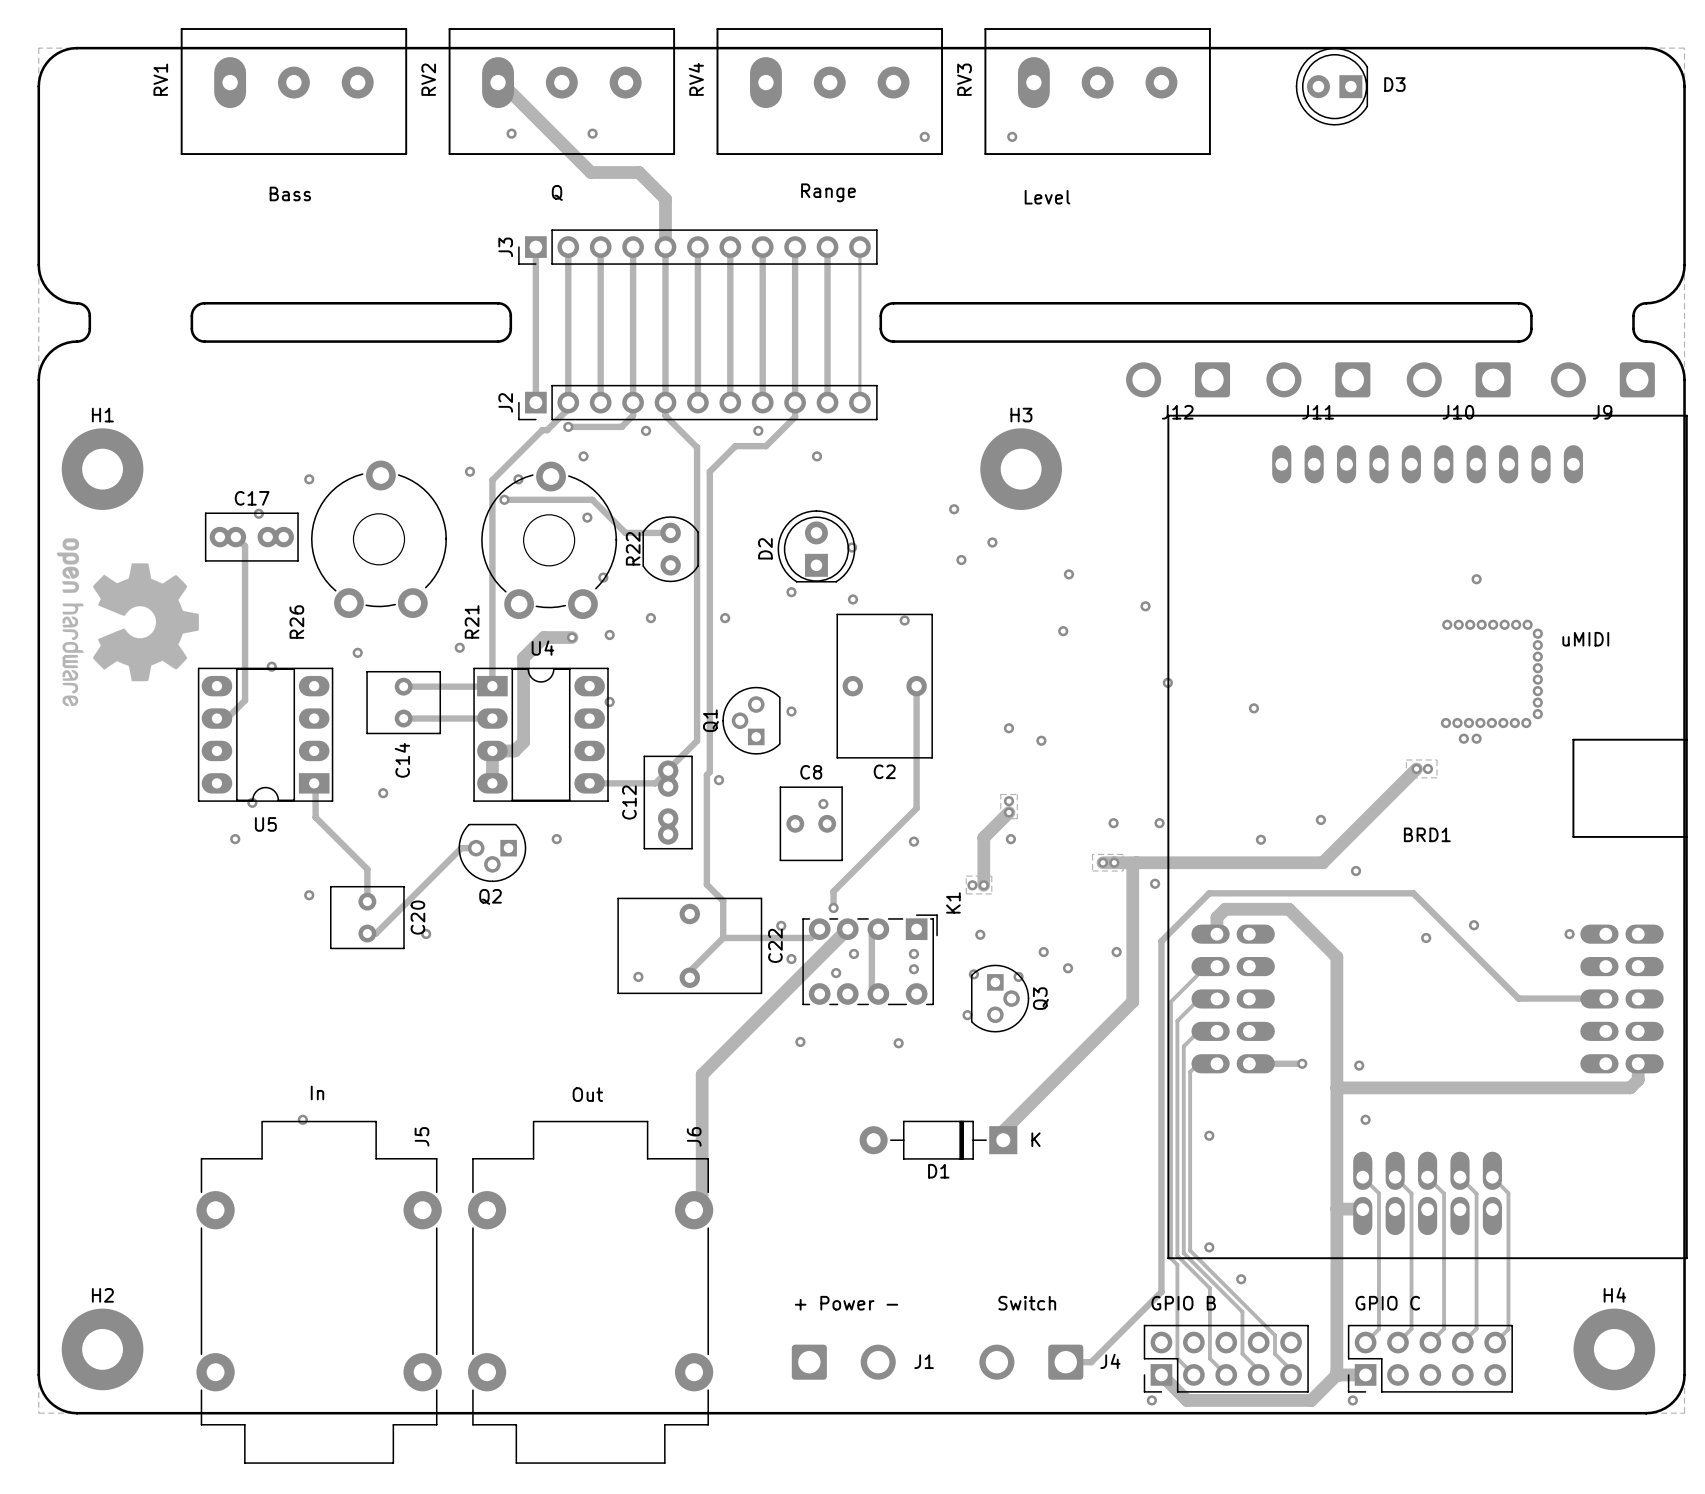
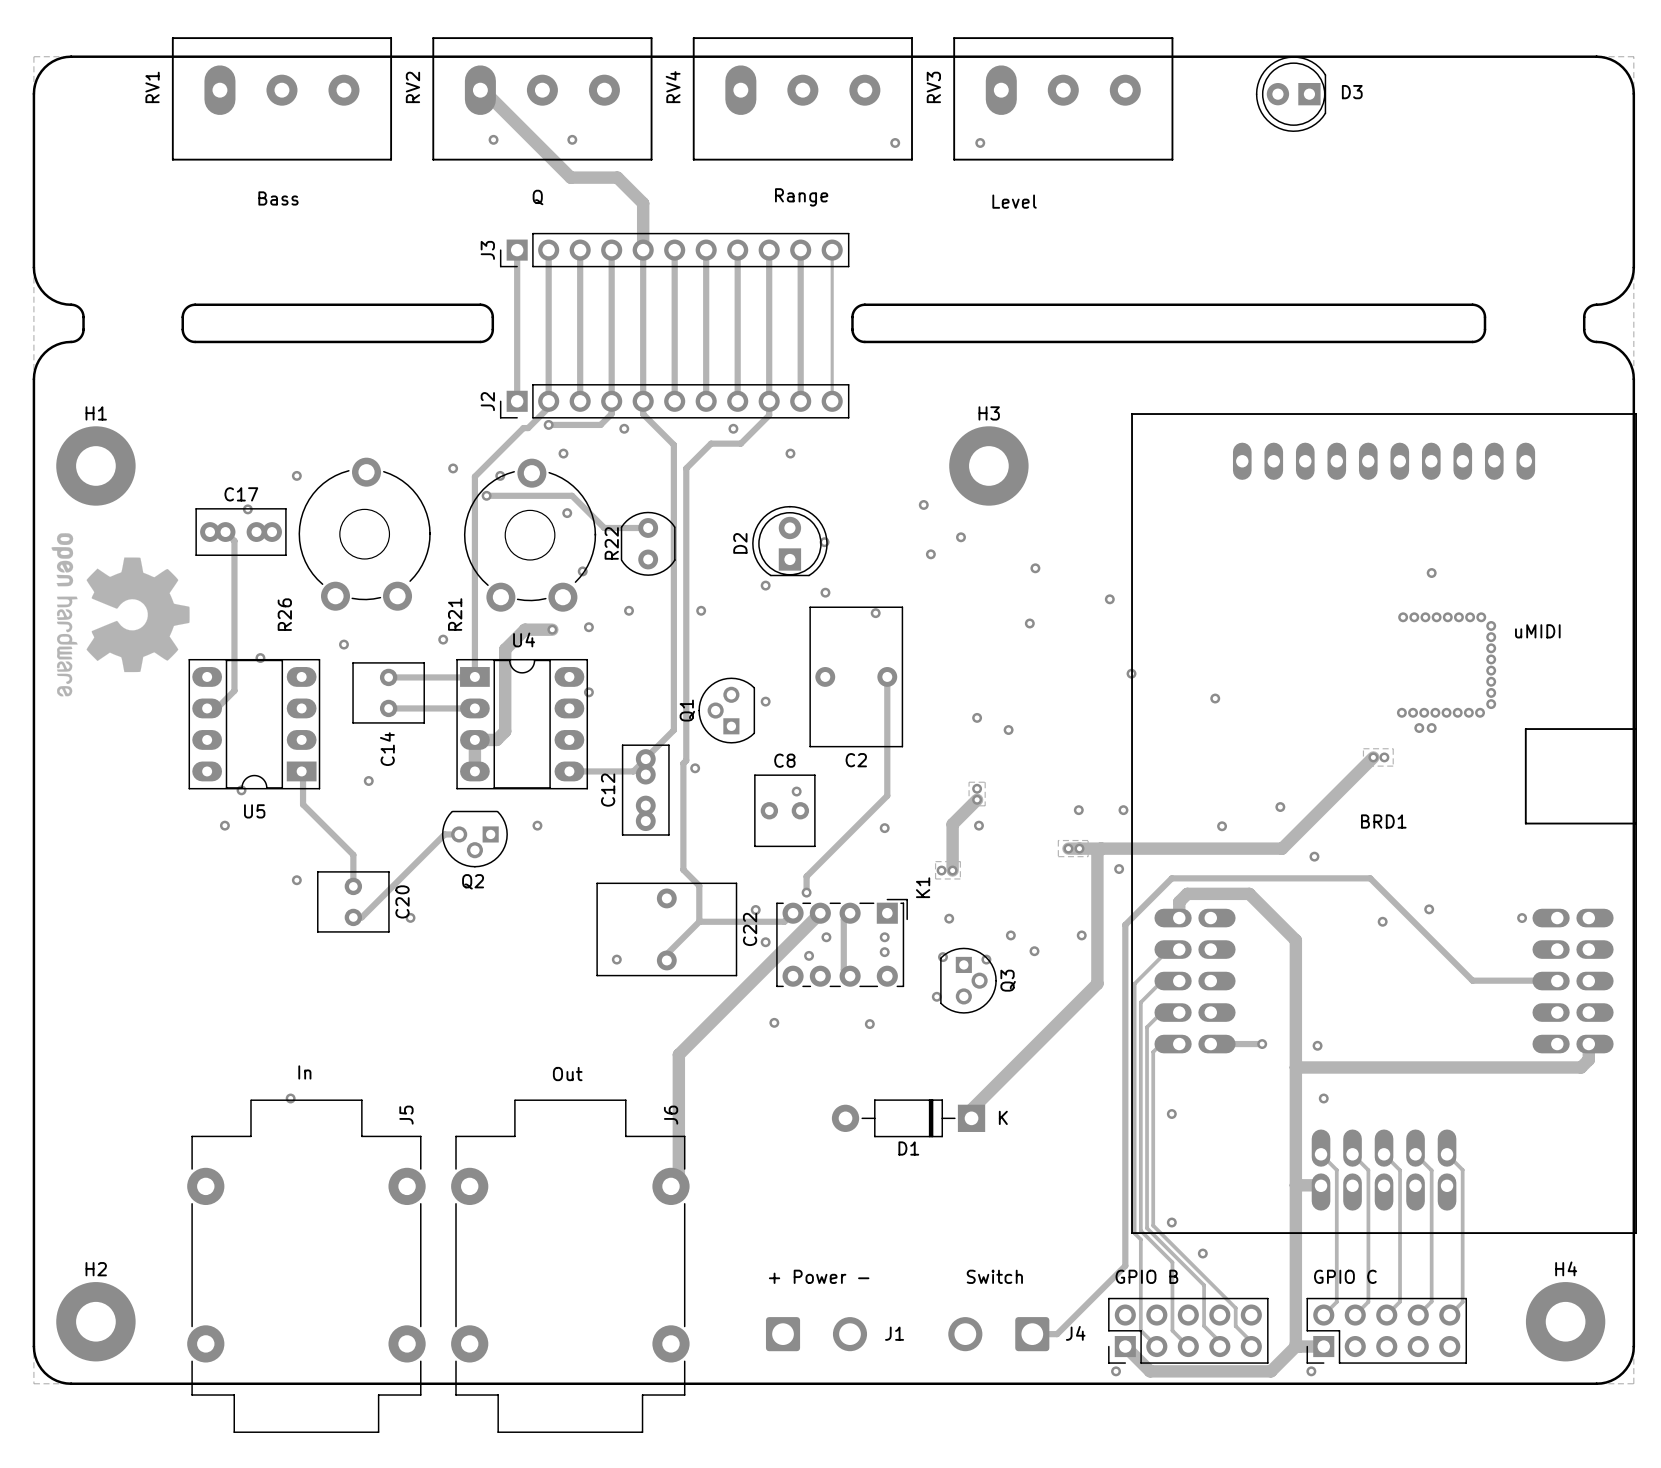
J12: (1178, 379) -> none
J11: (1318, 379) -> none
J10: (1458, 379) -> none
J9: (1602, 379) -> none

